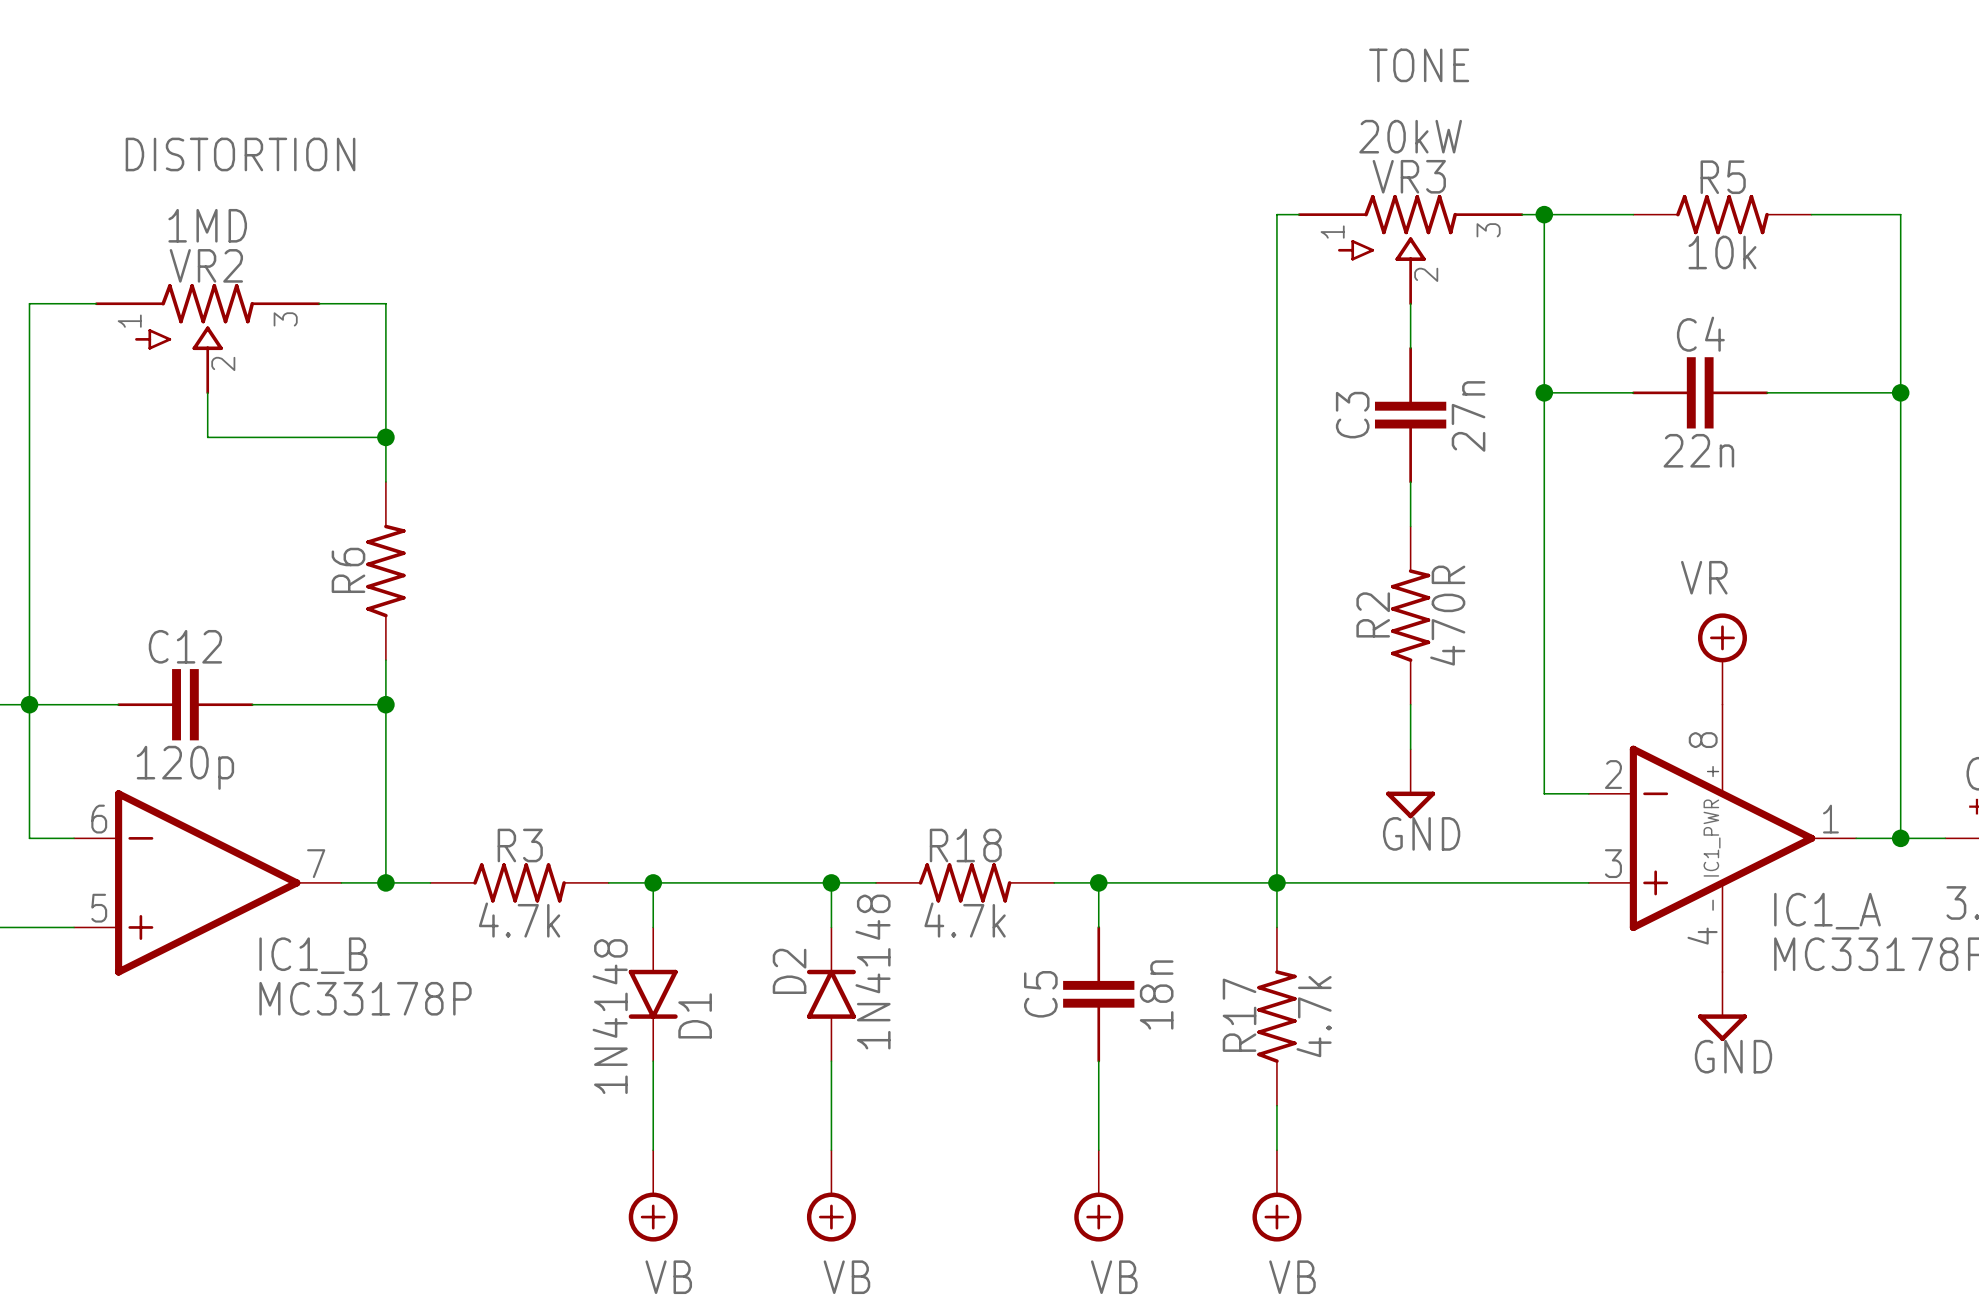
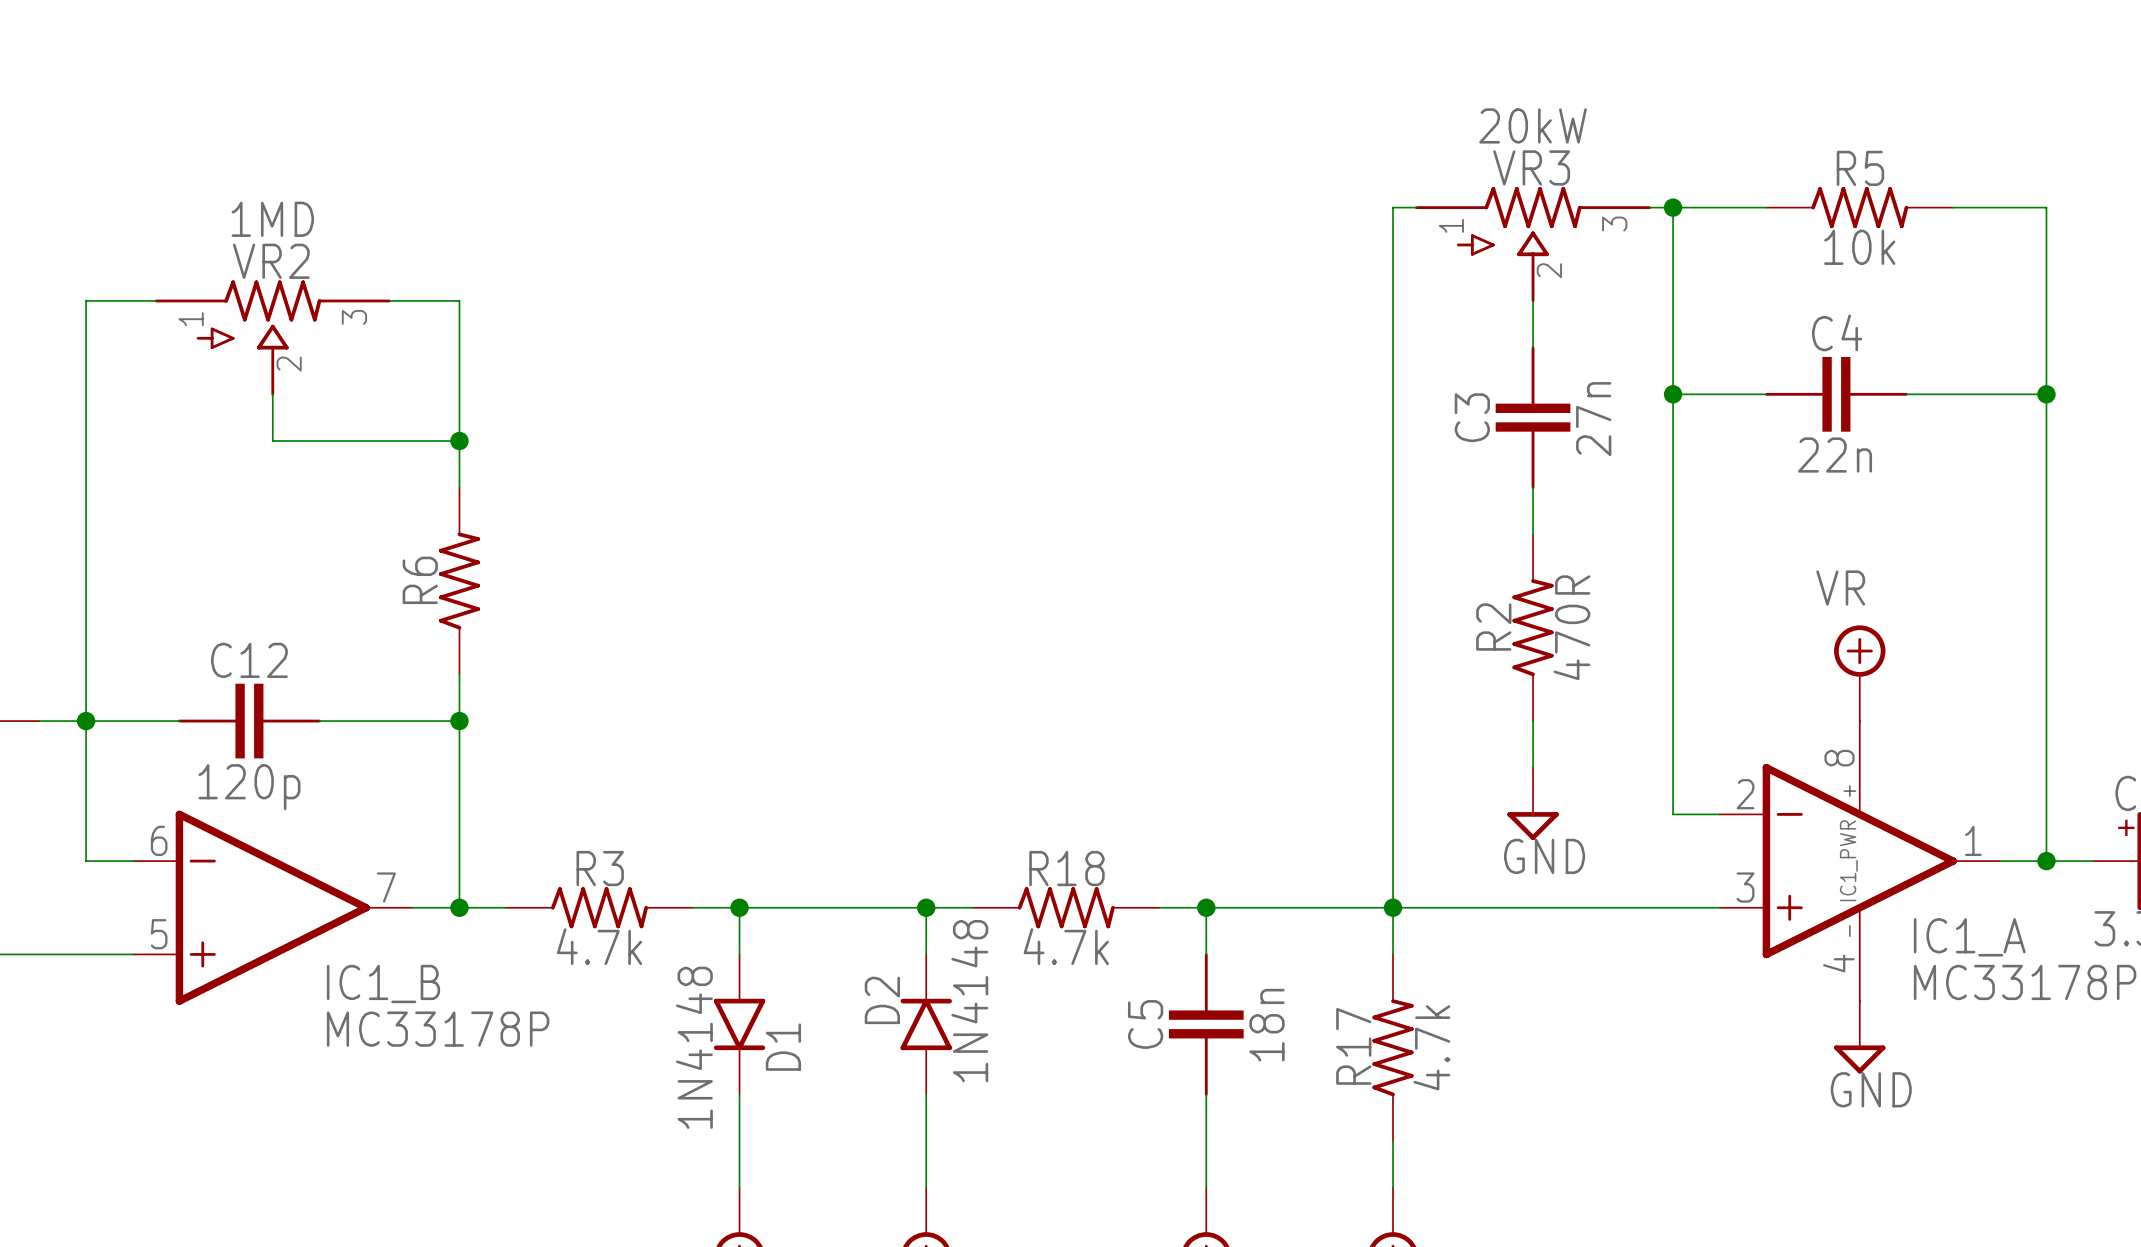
text: TONE (1419, 65) -> none
text: DISTORTION (240, 154) -> none

